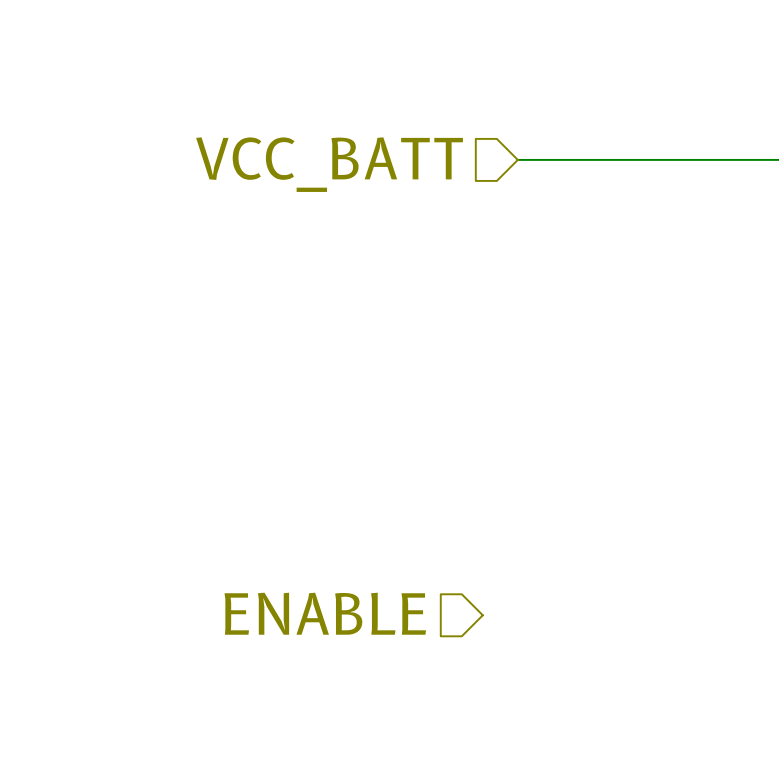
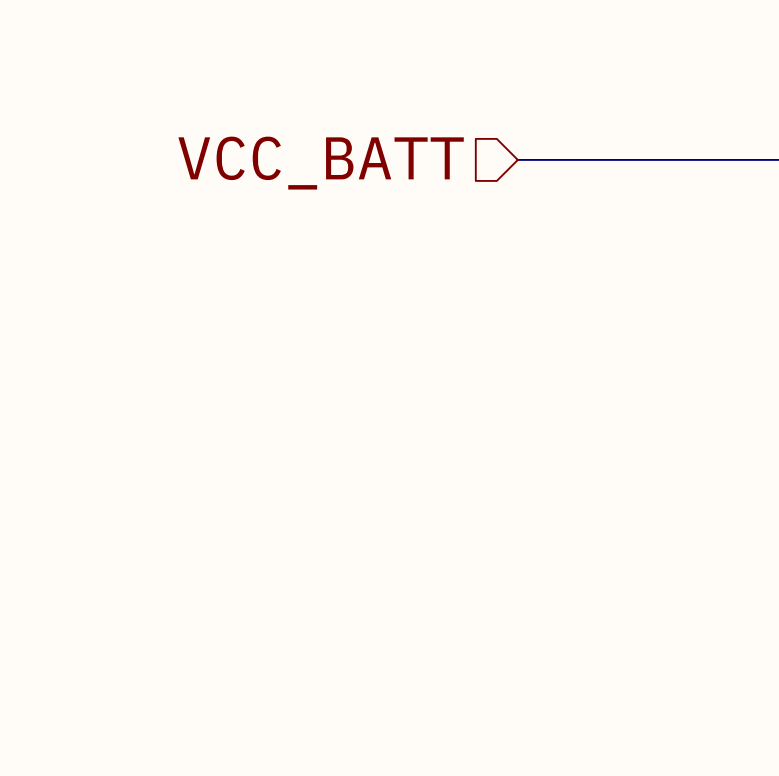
hierarchical label: ENABLE (325, 613) -> none

